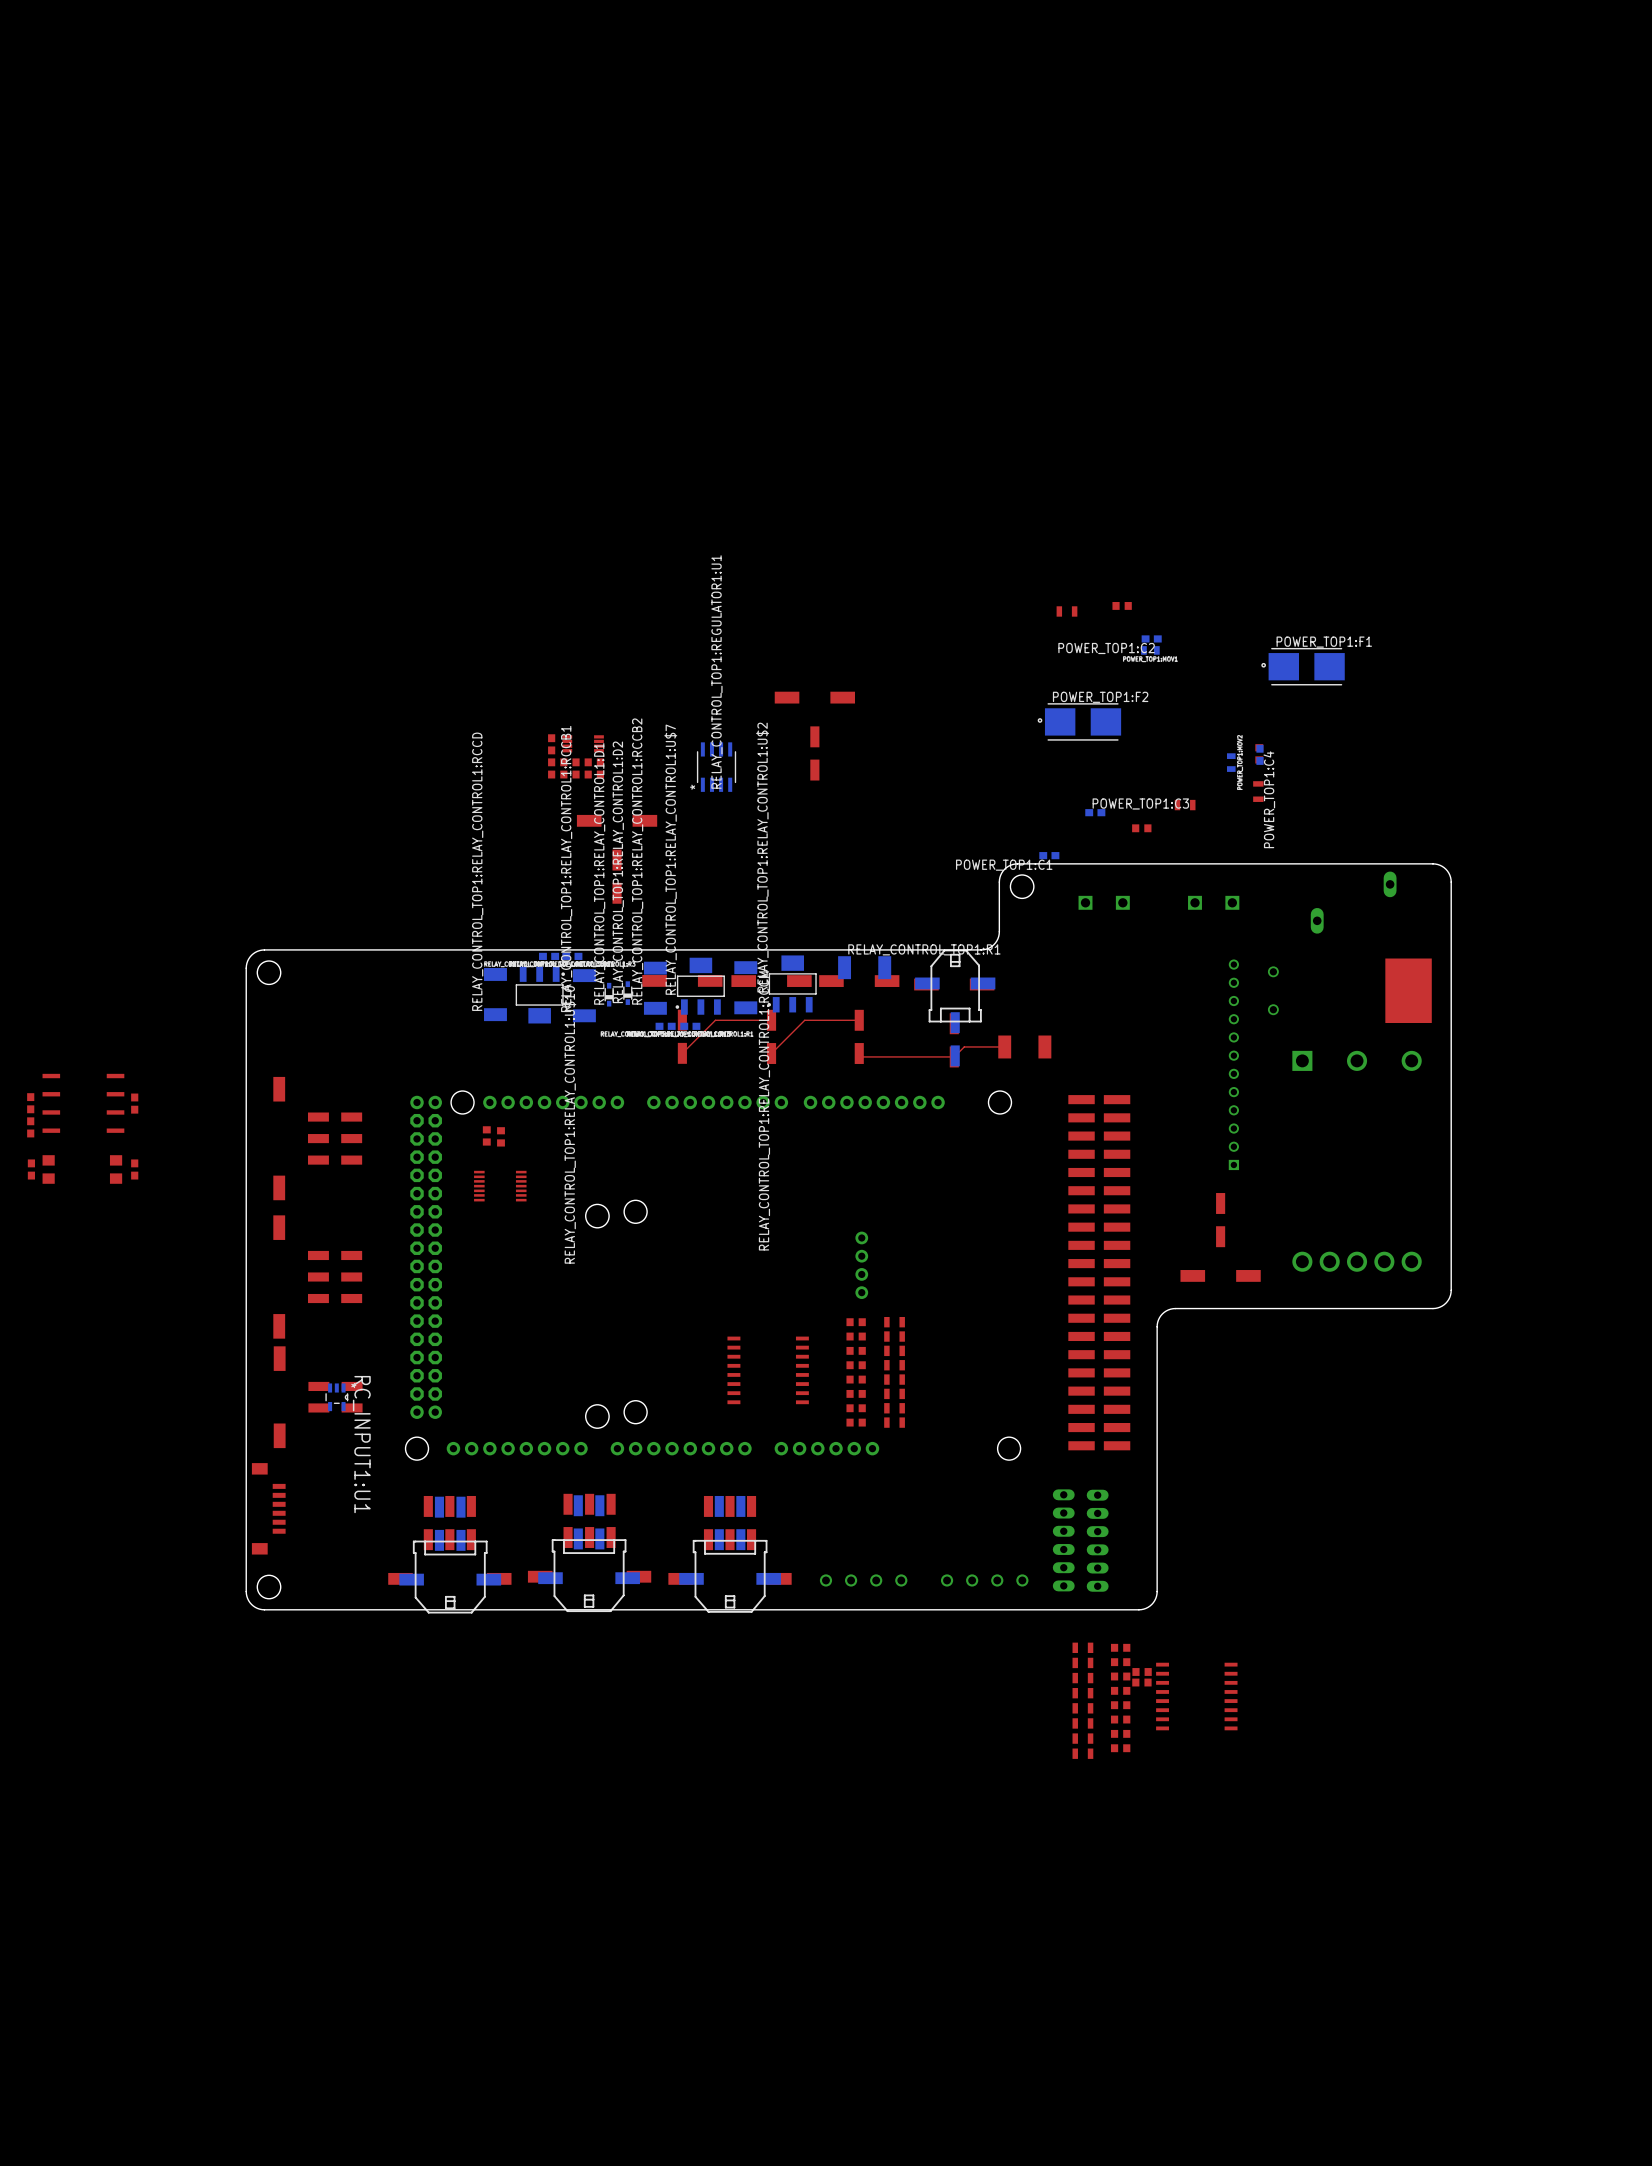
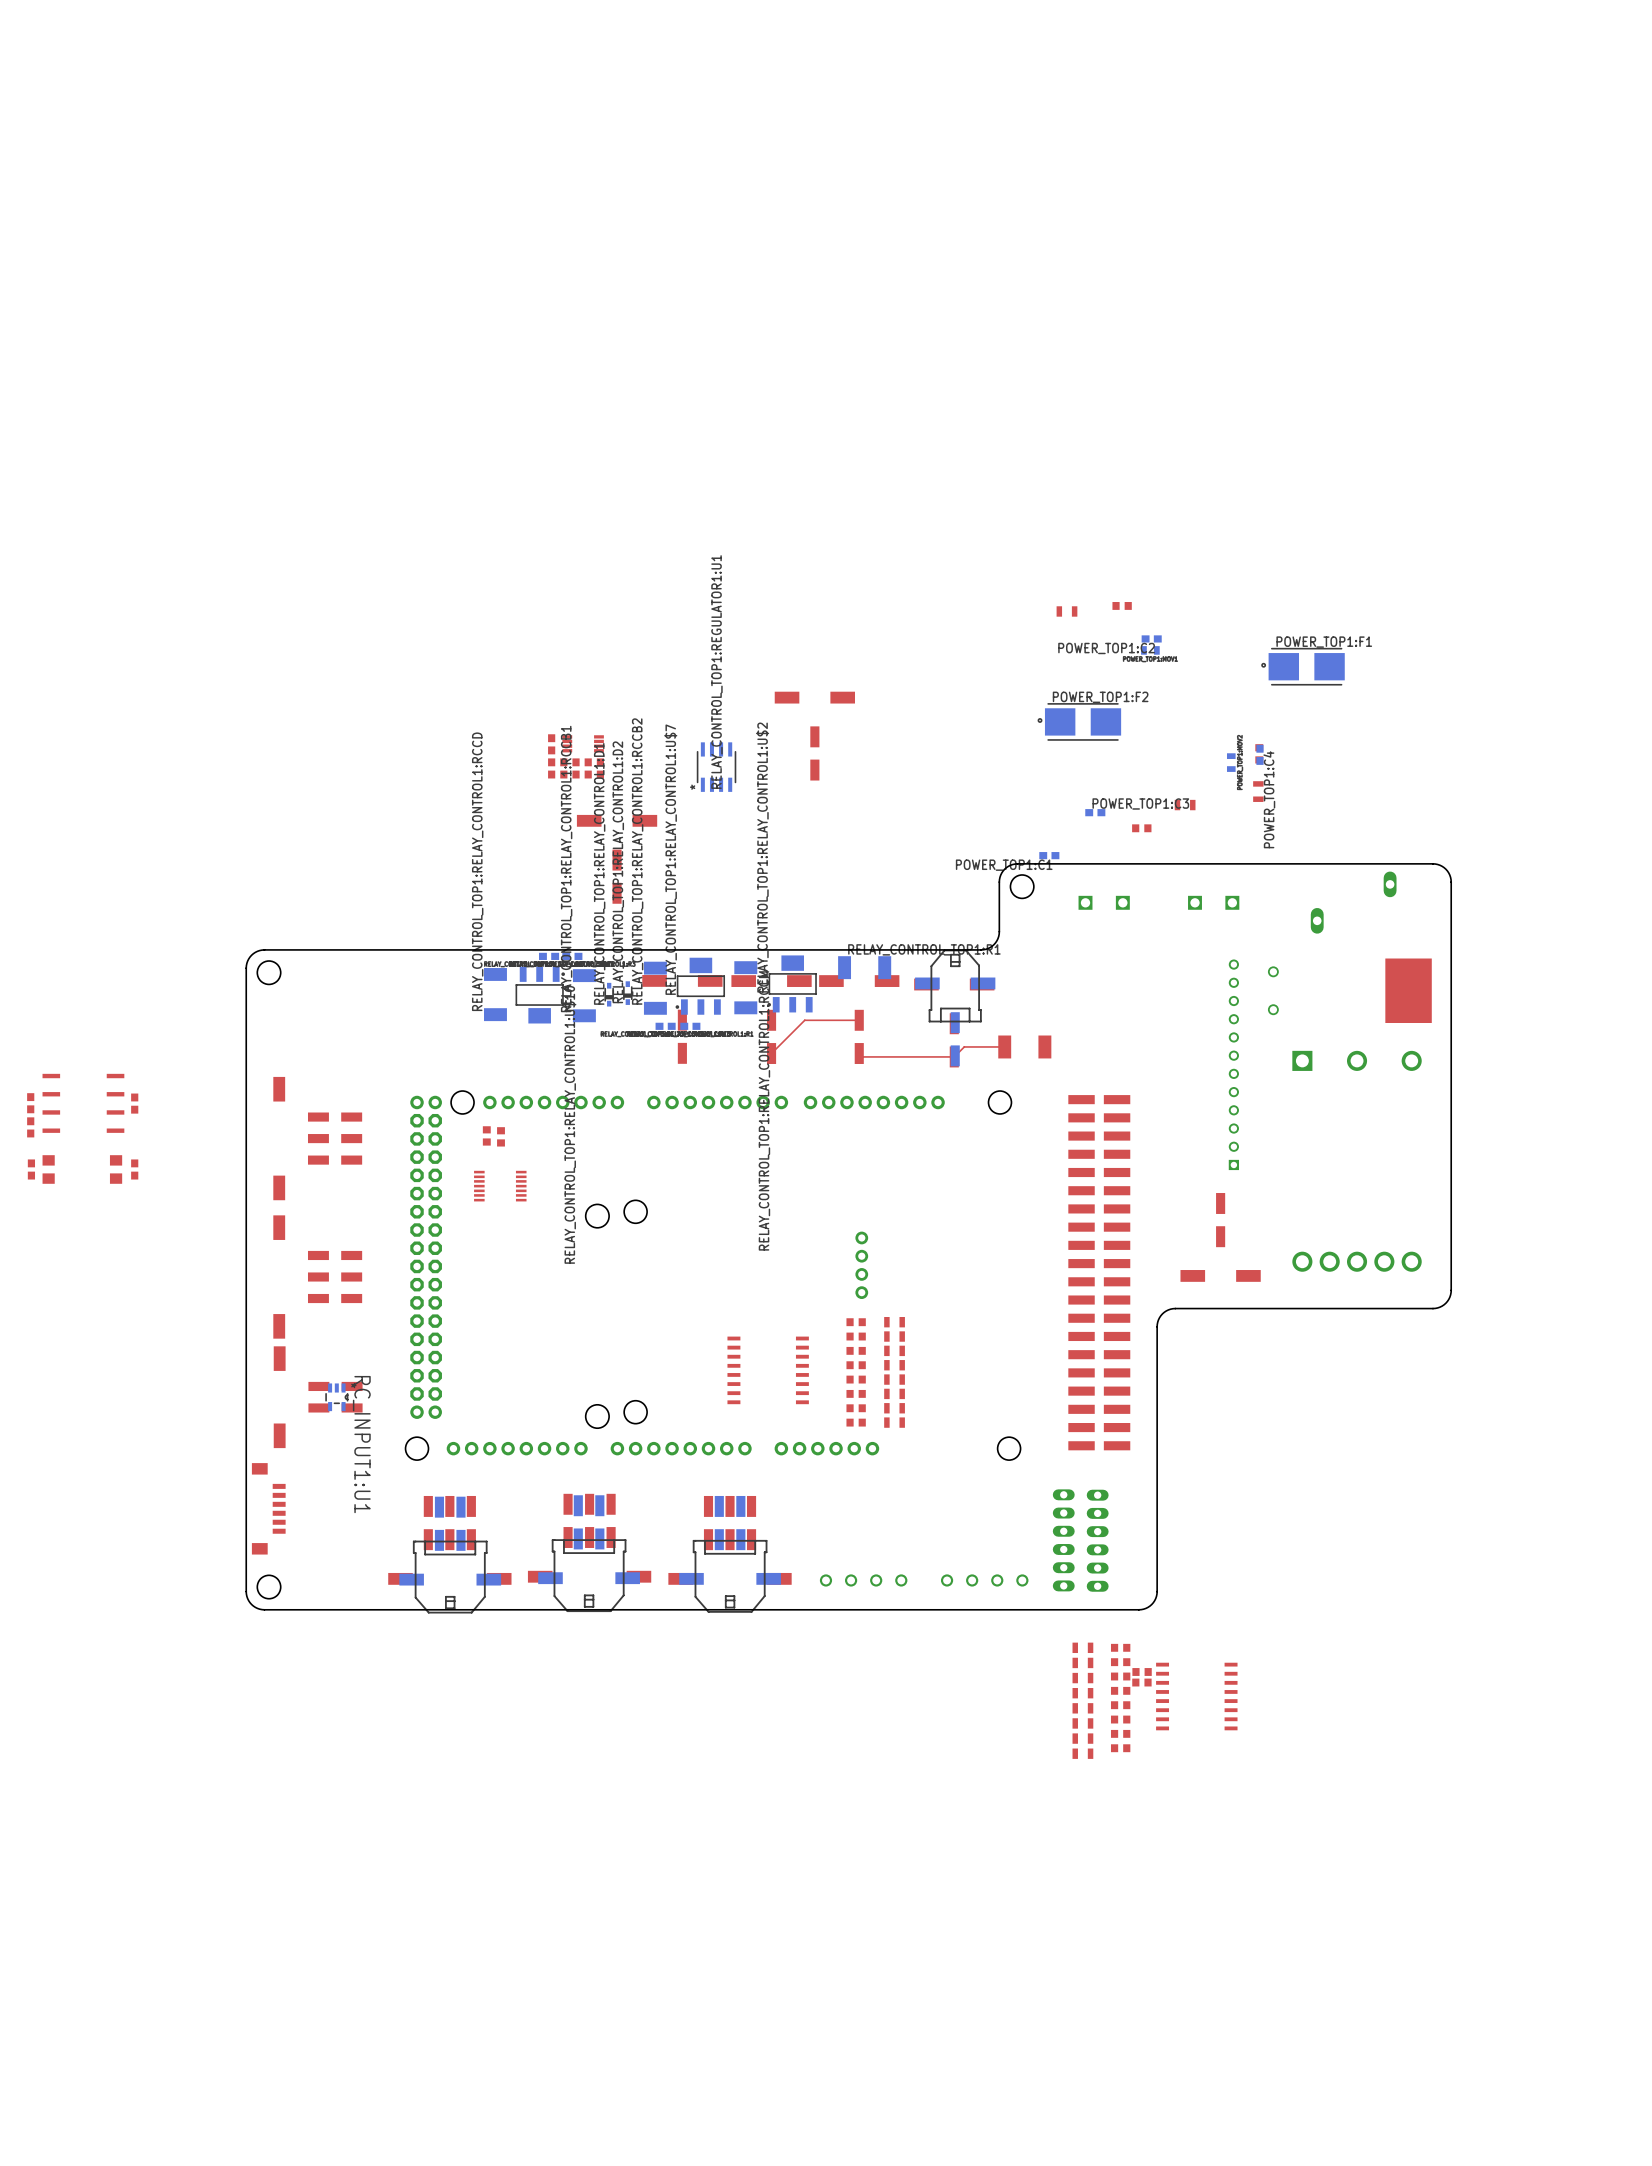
top track: (771, 1020) (715, 1020) (682, 1053) -> none

